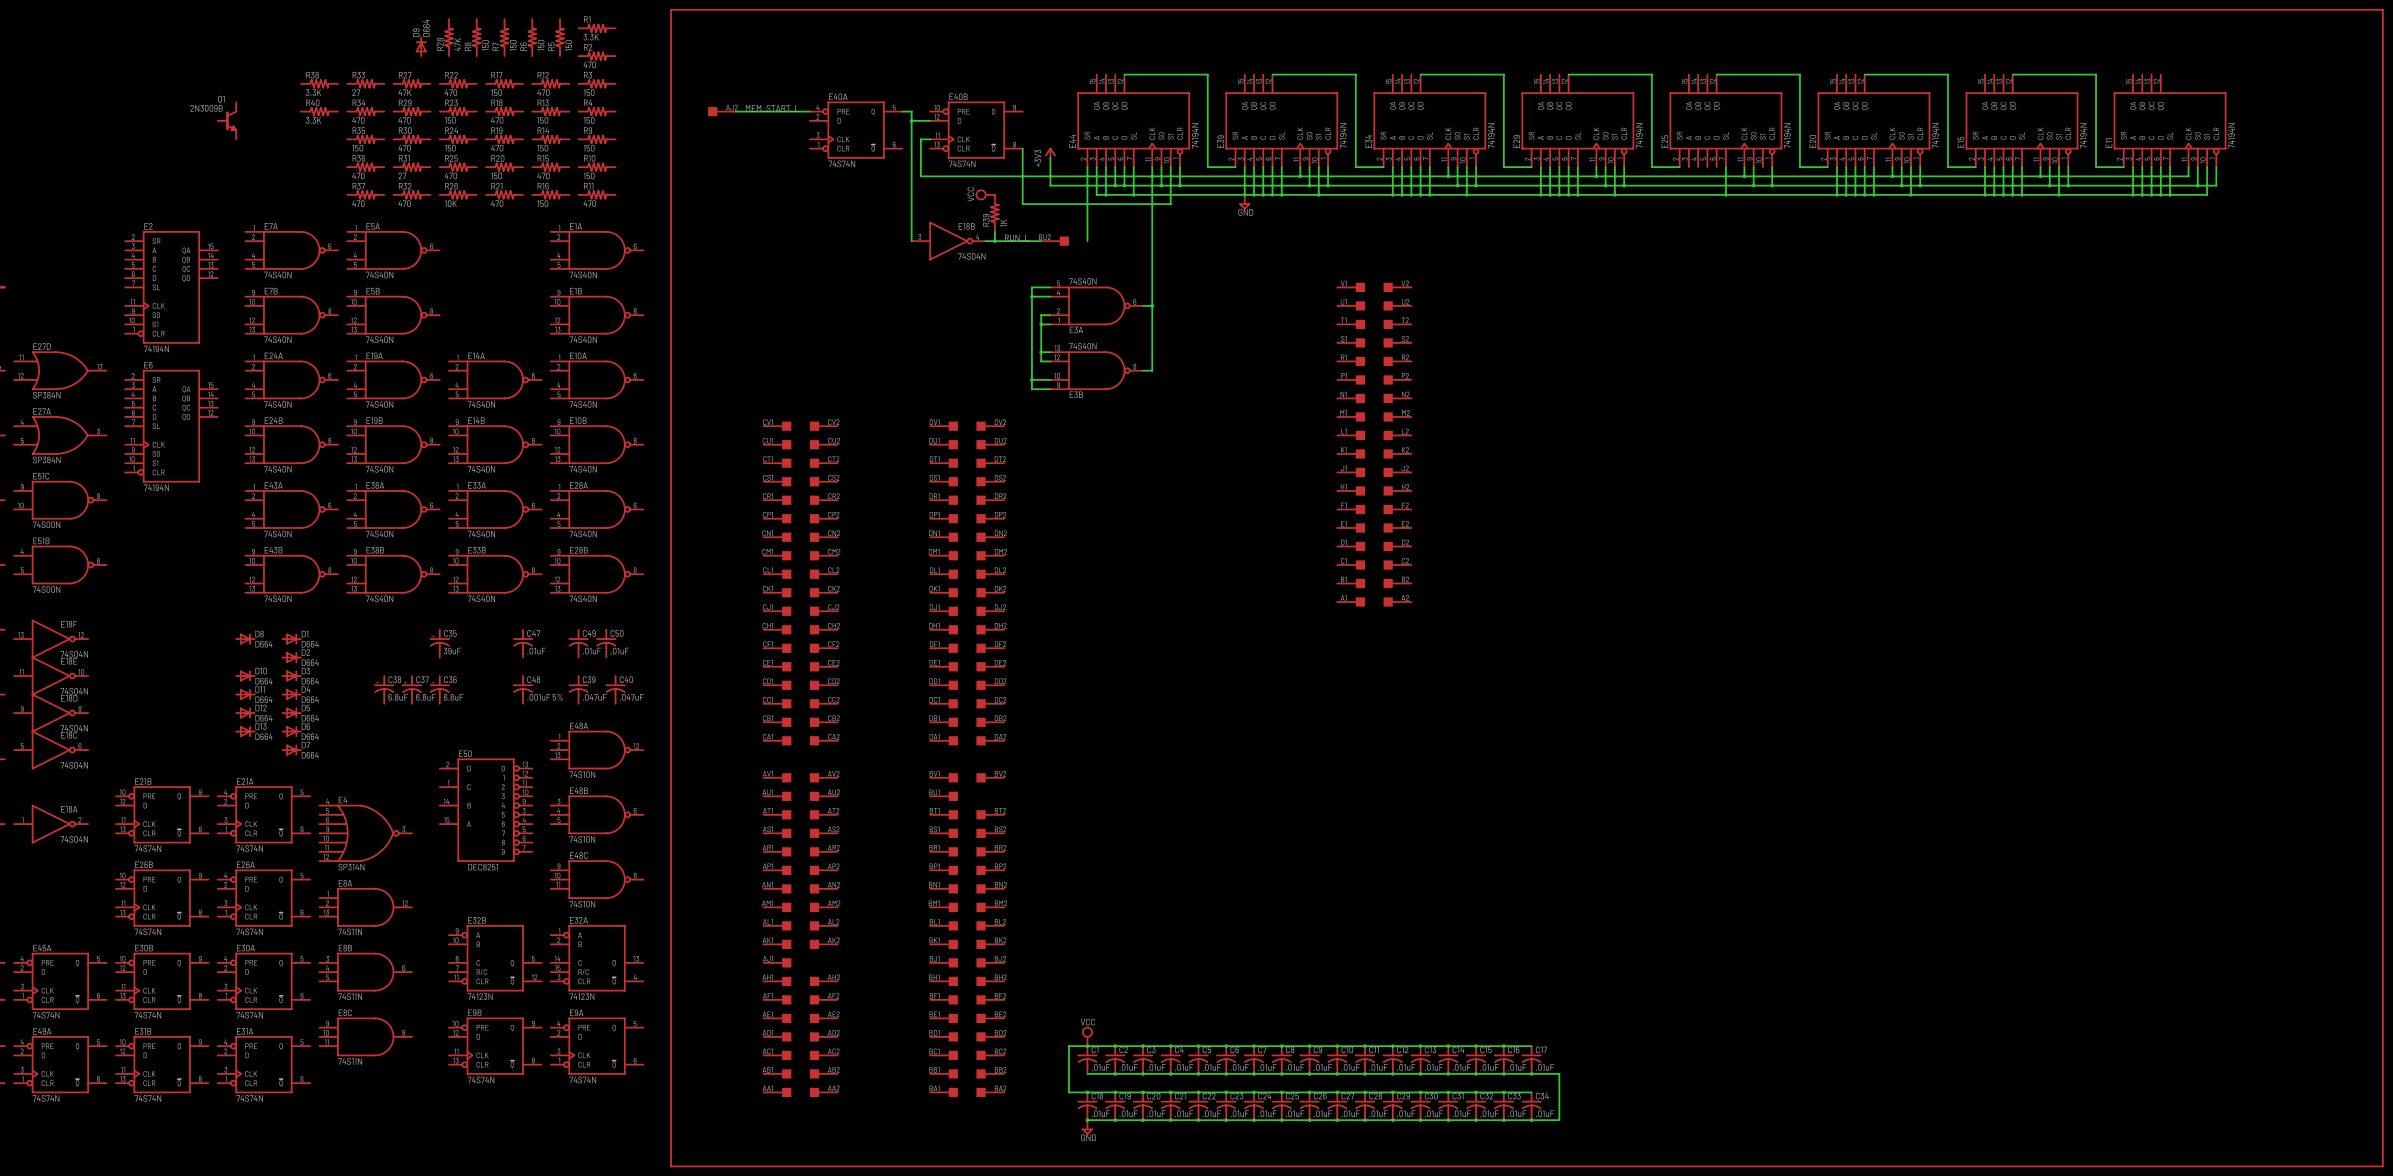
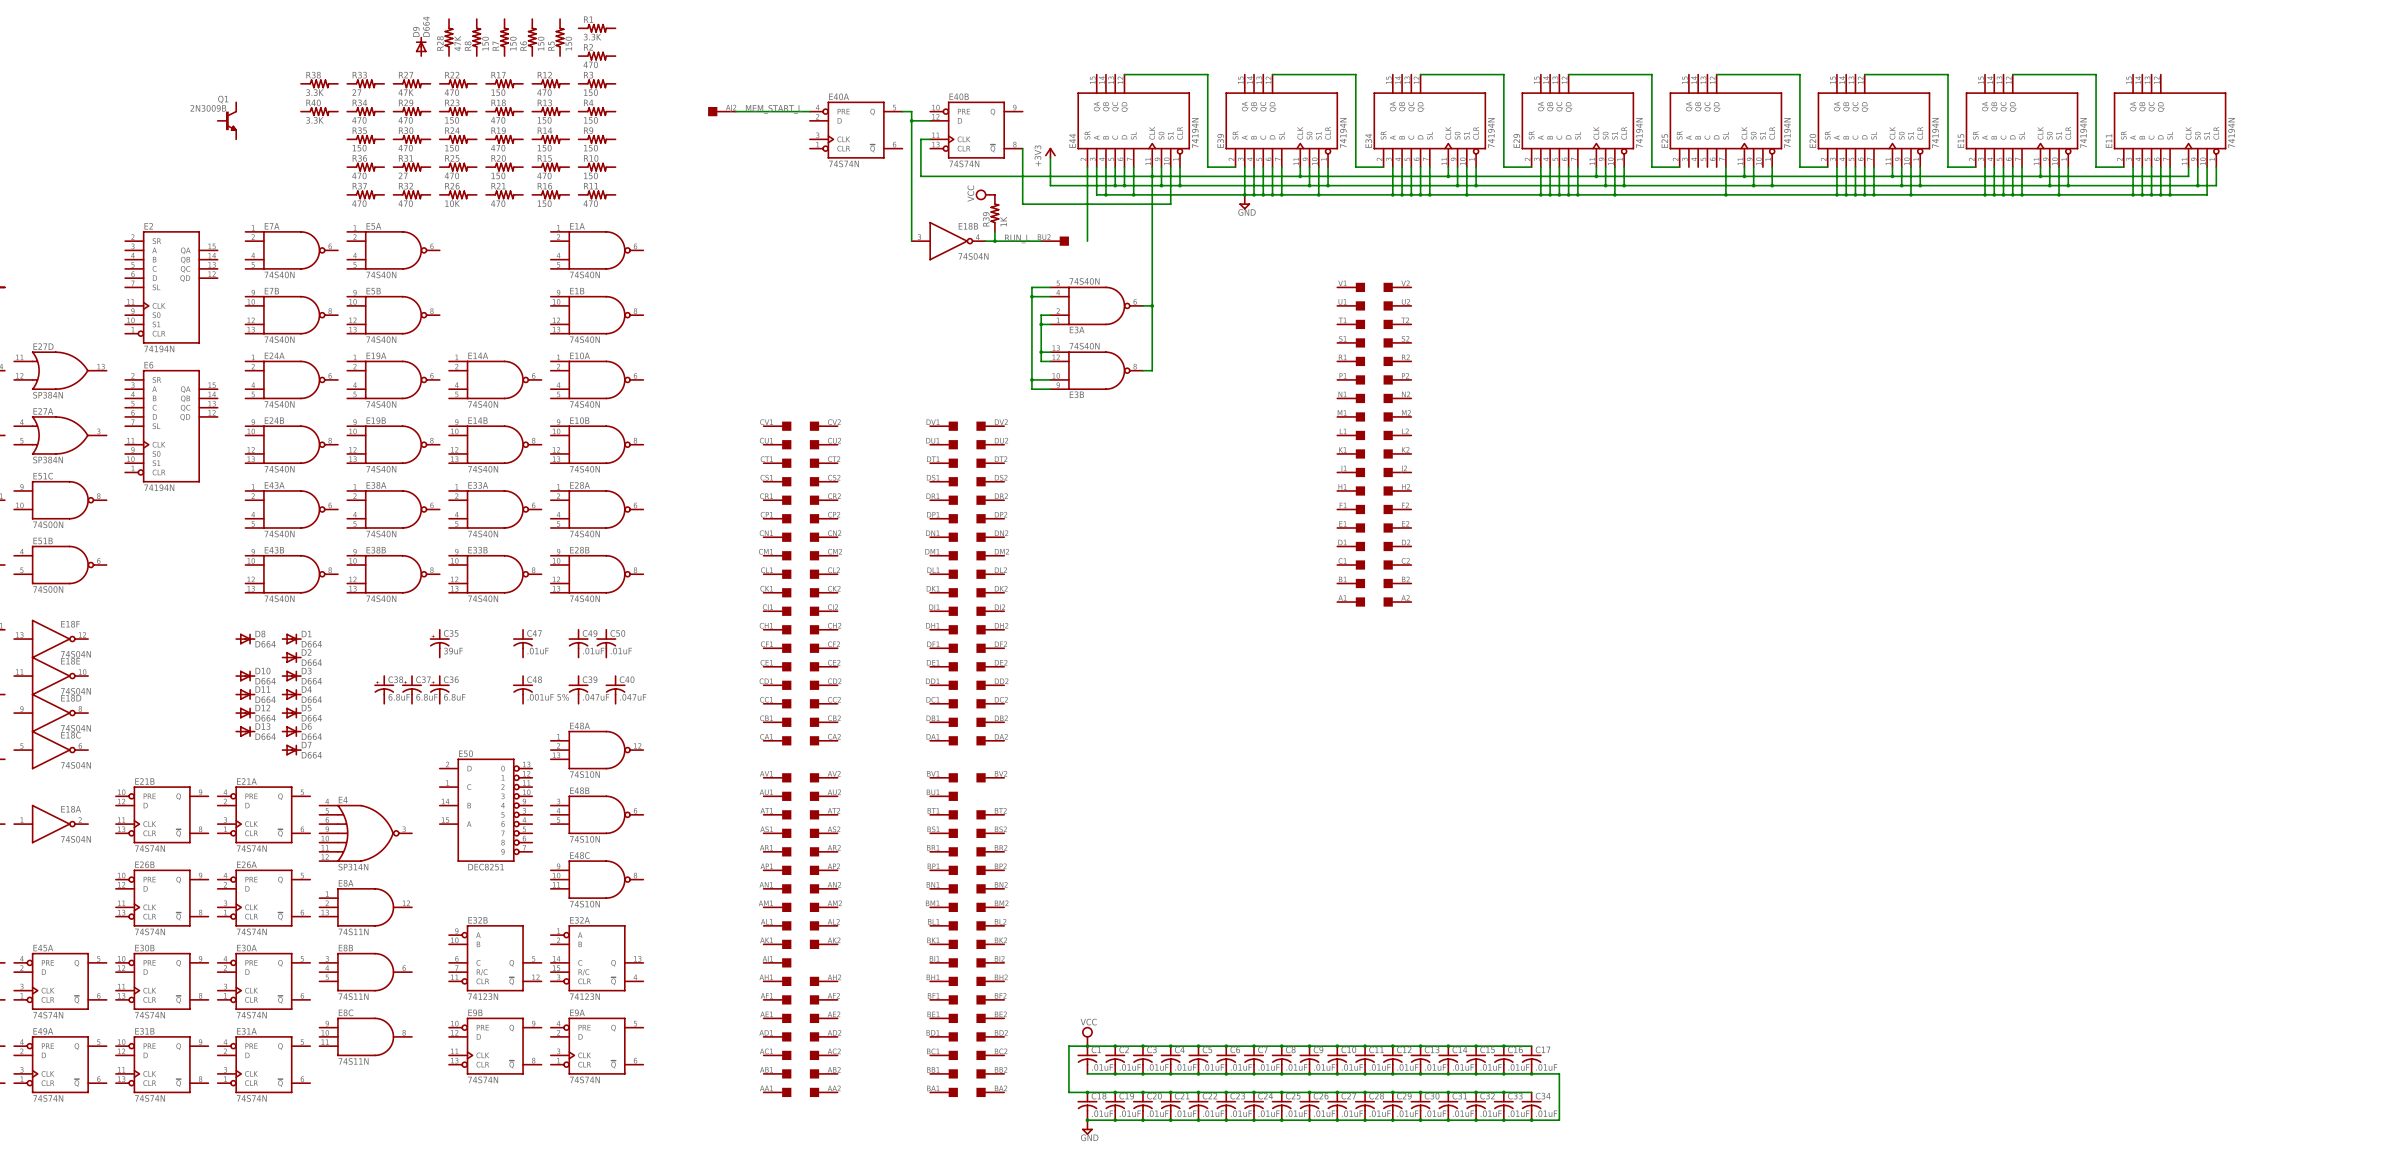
part: (1526, 588) -> none

